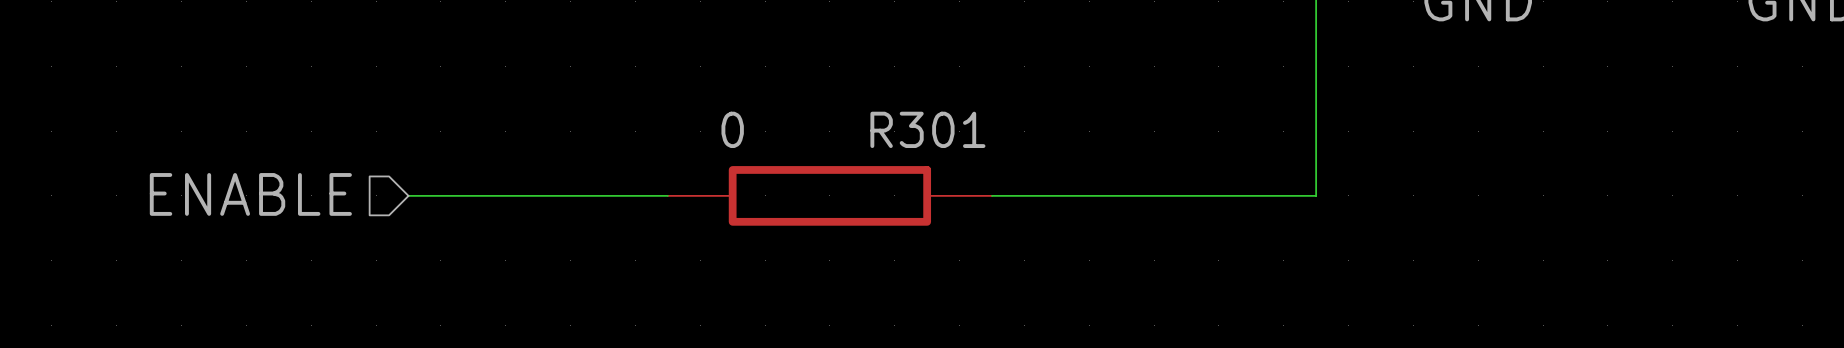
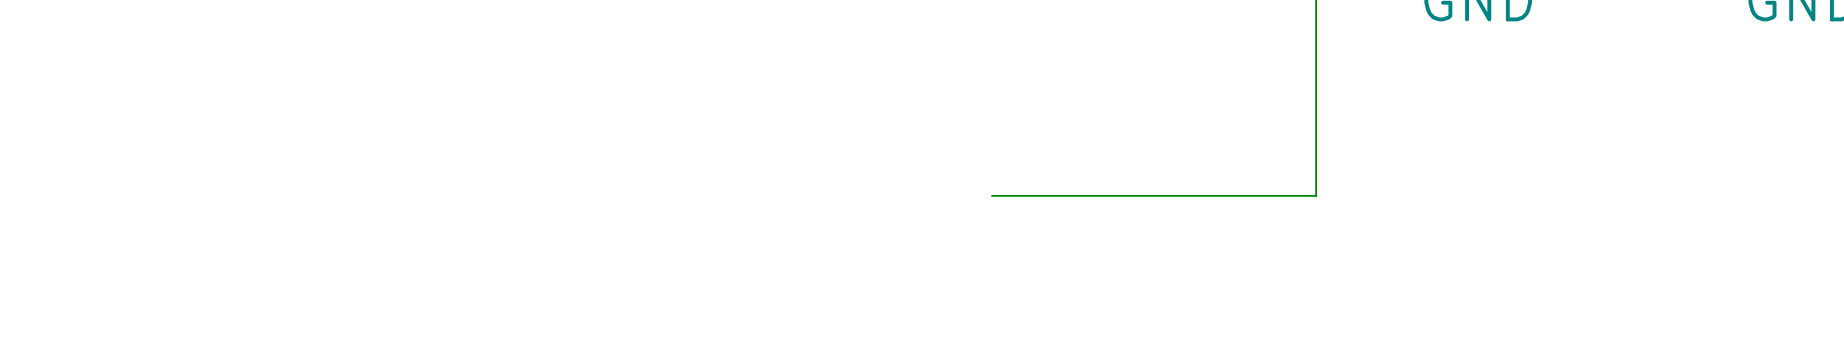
hierarchical label: ENABLE (250, 194) -> none
wire: (408, 195) (667, 195) -> none
R301: 0 (829, 195) -> none

